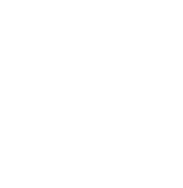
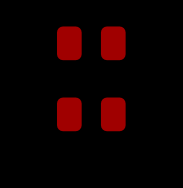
part: none -> (91, 43)
part: none -> (91, 114)

